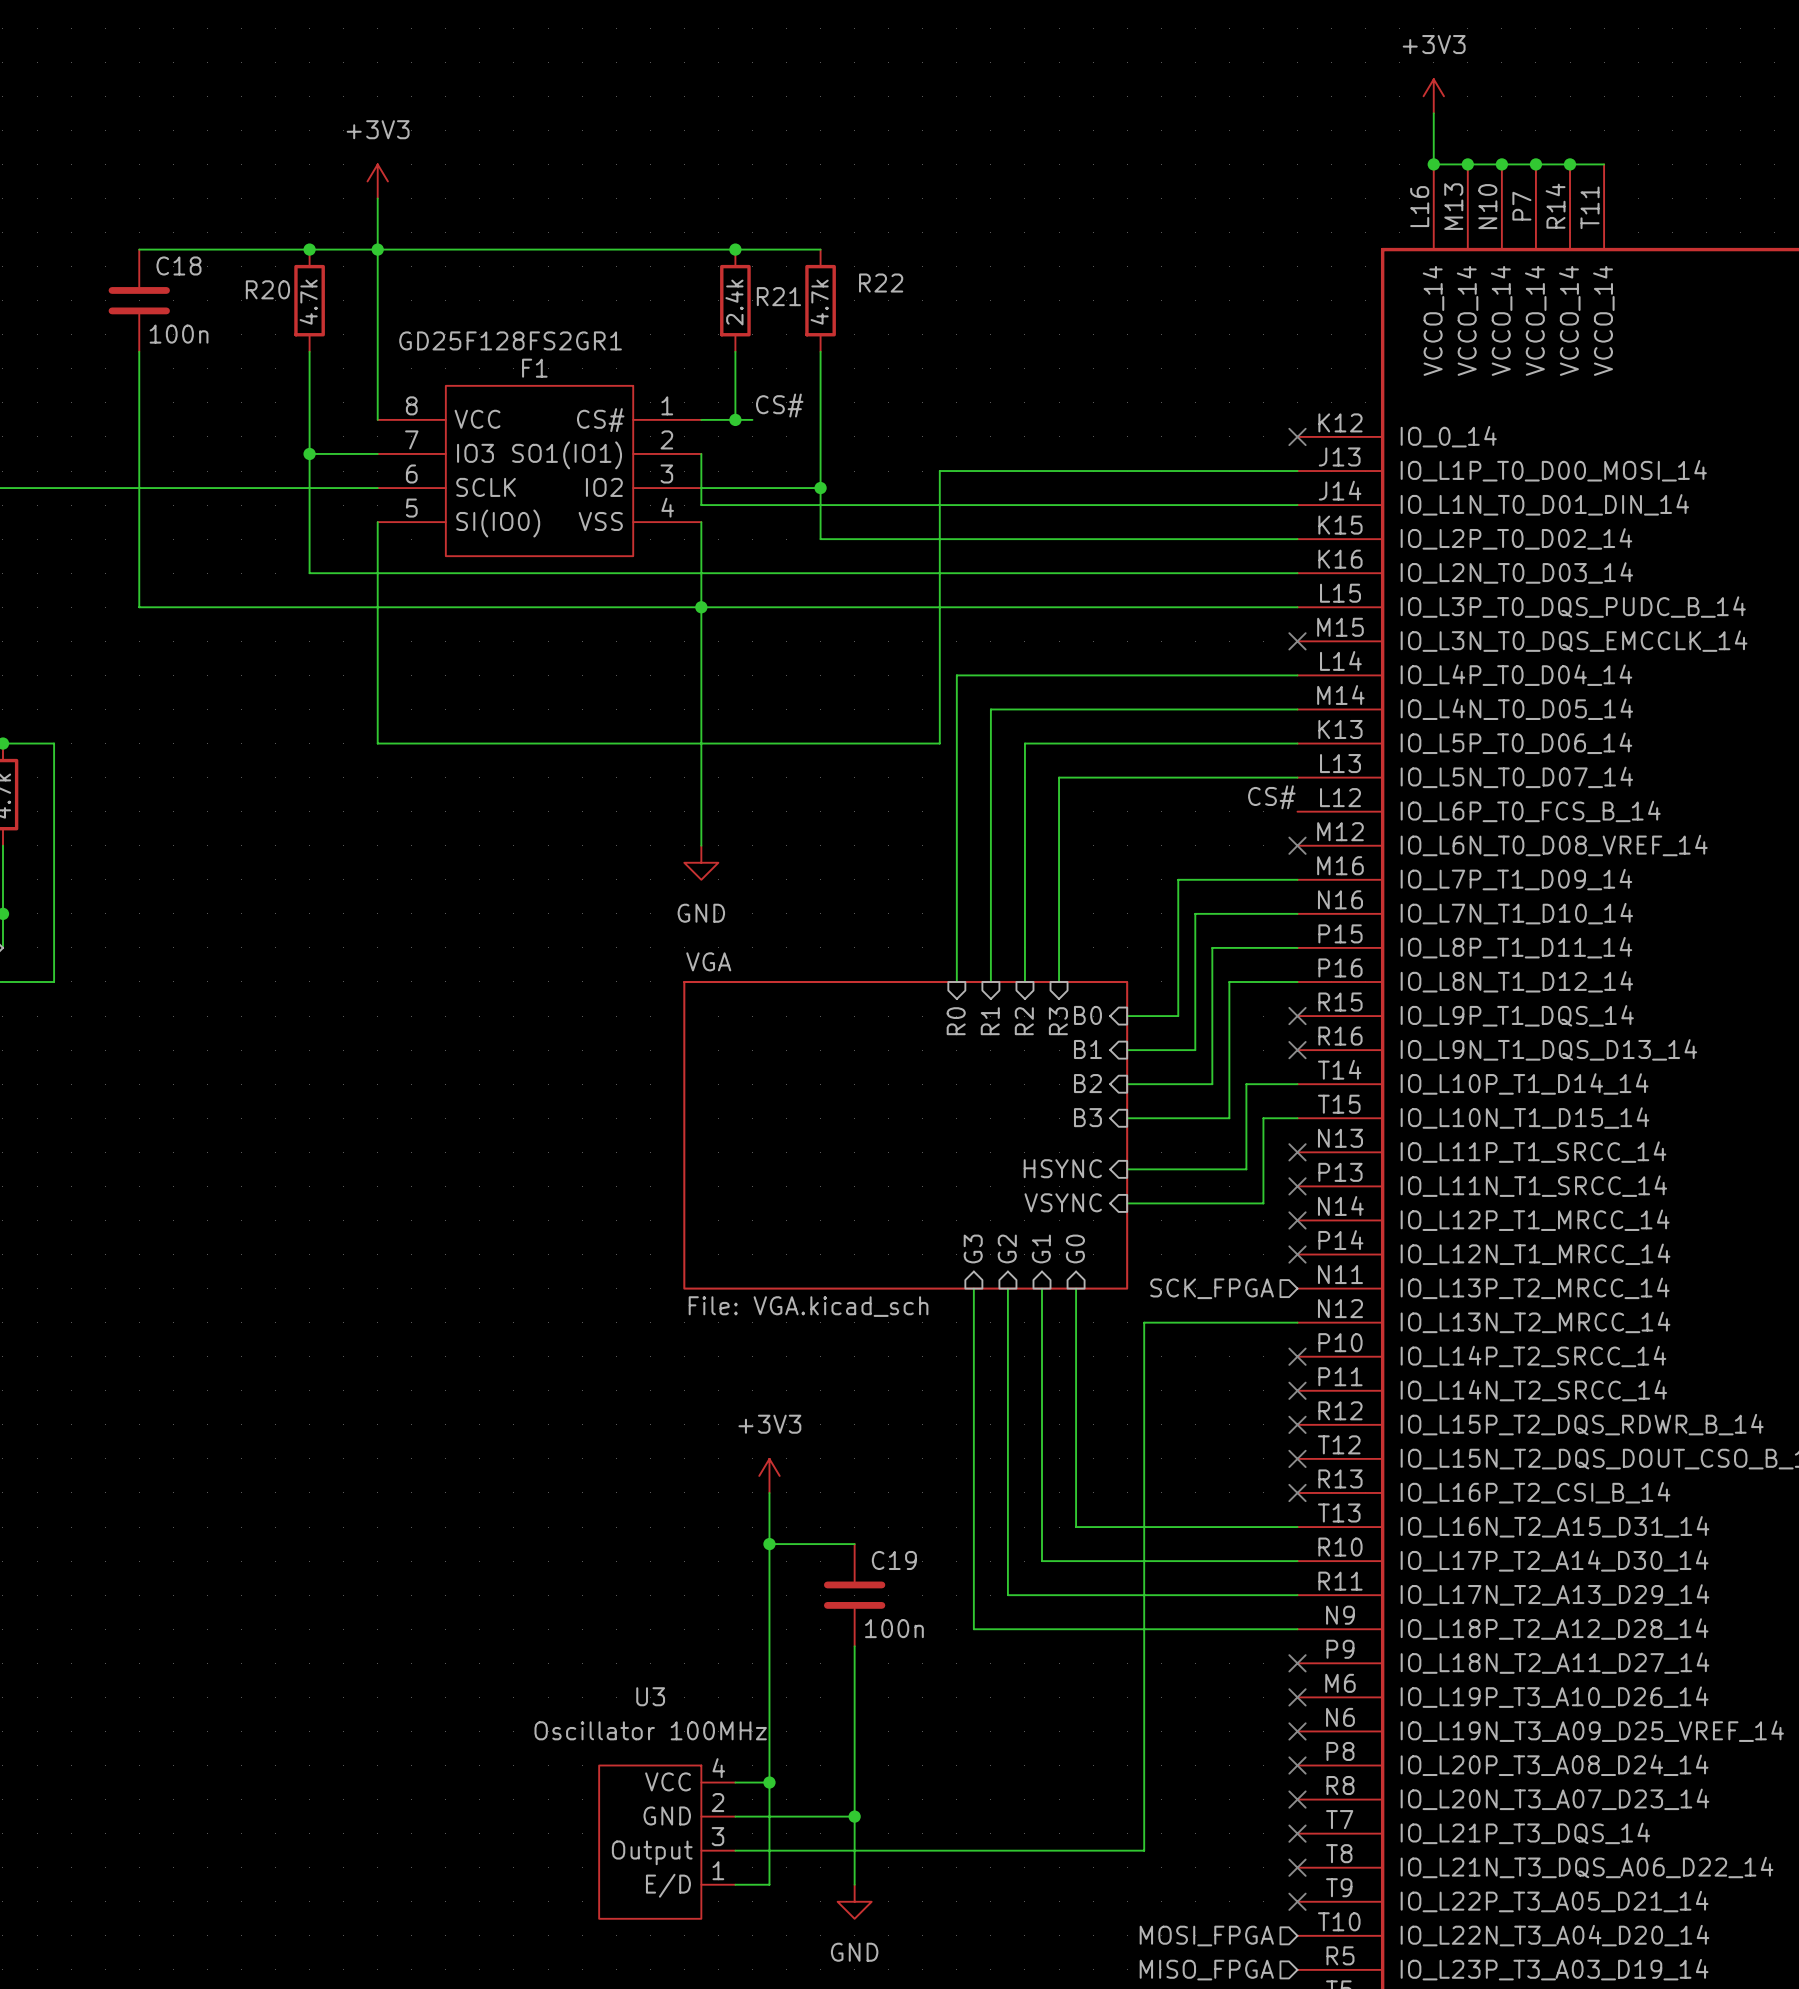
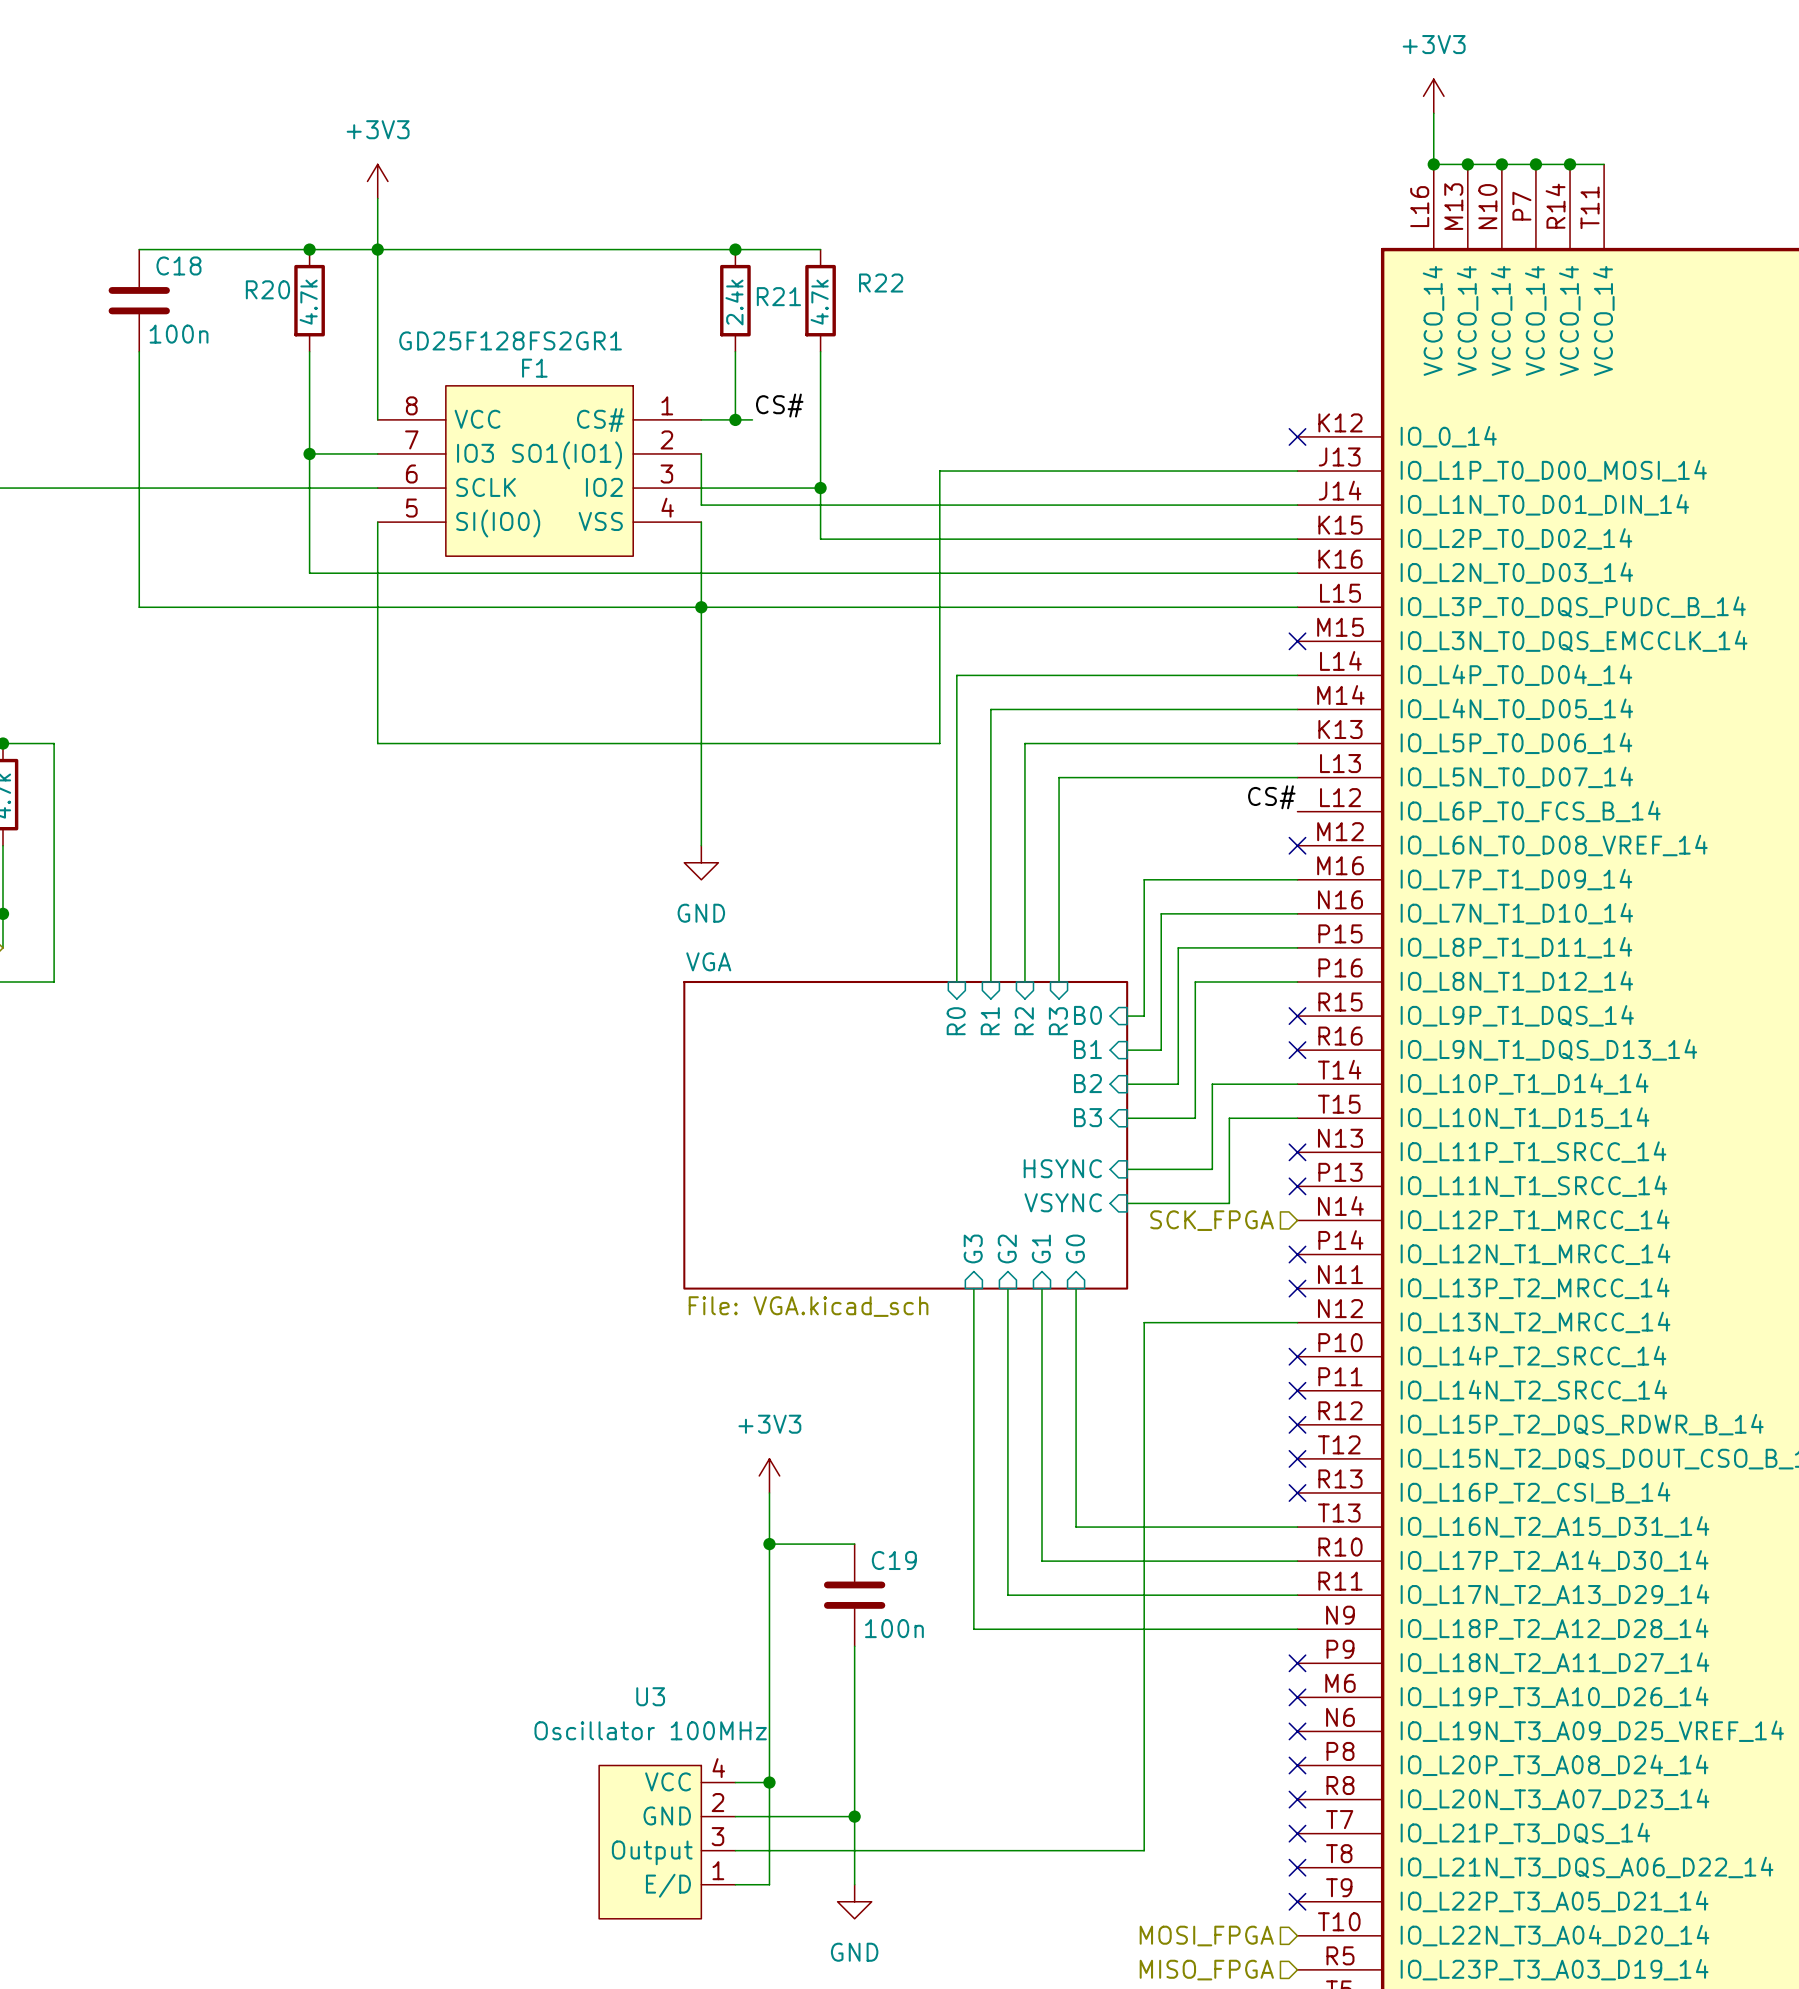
wire: (1178, 879) (1178, 947) -> (1212, 947) (1178, 947)
wire: (1195, 913) (1195, 981) -> (1195, 913) (1161, 913) (1161, 1050)
wire: (1212, 947) (1212, 1084) (1178, 1084) -> (1178, 1016) (1178, 1084)
wire: (1229, 981) (1229, 1118) (1195, 1118) -> (1229, 981) (1195, 981)
wire: (1144, 1016) (1178, 1016) -> (1144, 1016) (1144, 879) (1178, 879)
wire: (1161, 1050) (1195, 1050) -> (1195, 1118) (1195, 1050)
wire: (1246, 1084) (1246, 1169) (1212, 1169) -> (1246, 1084) (1212, 1084) (1212, 1169)
wire: (1263, 1118) (1263, 1203) (1229, 1203) -> (1263, 1118) (1229, 1118) (1229, 1203)
no-connect mark position: (1297, 1220) -> (1297, 1288)
hierarchical label position: SCK_FPGA (1212, 1288) -> SCK_FPGA (1212, 1220)

